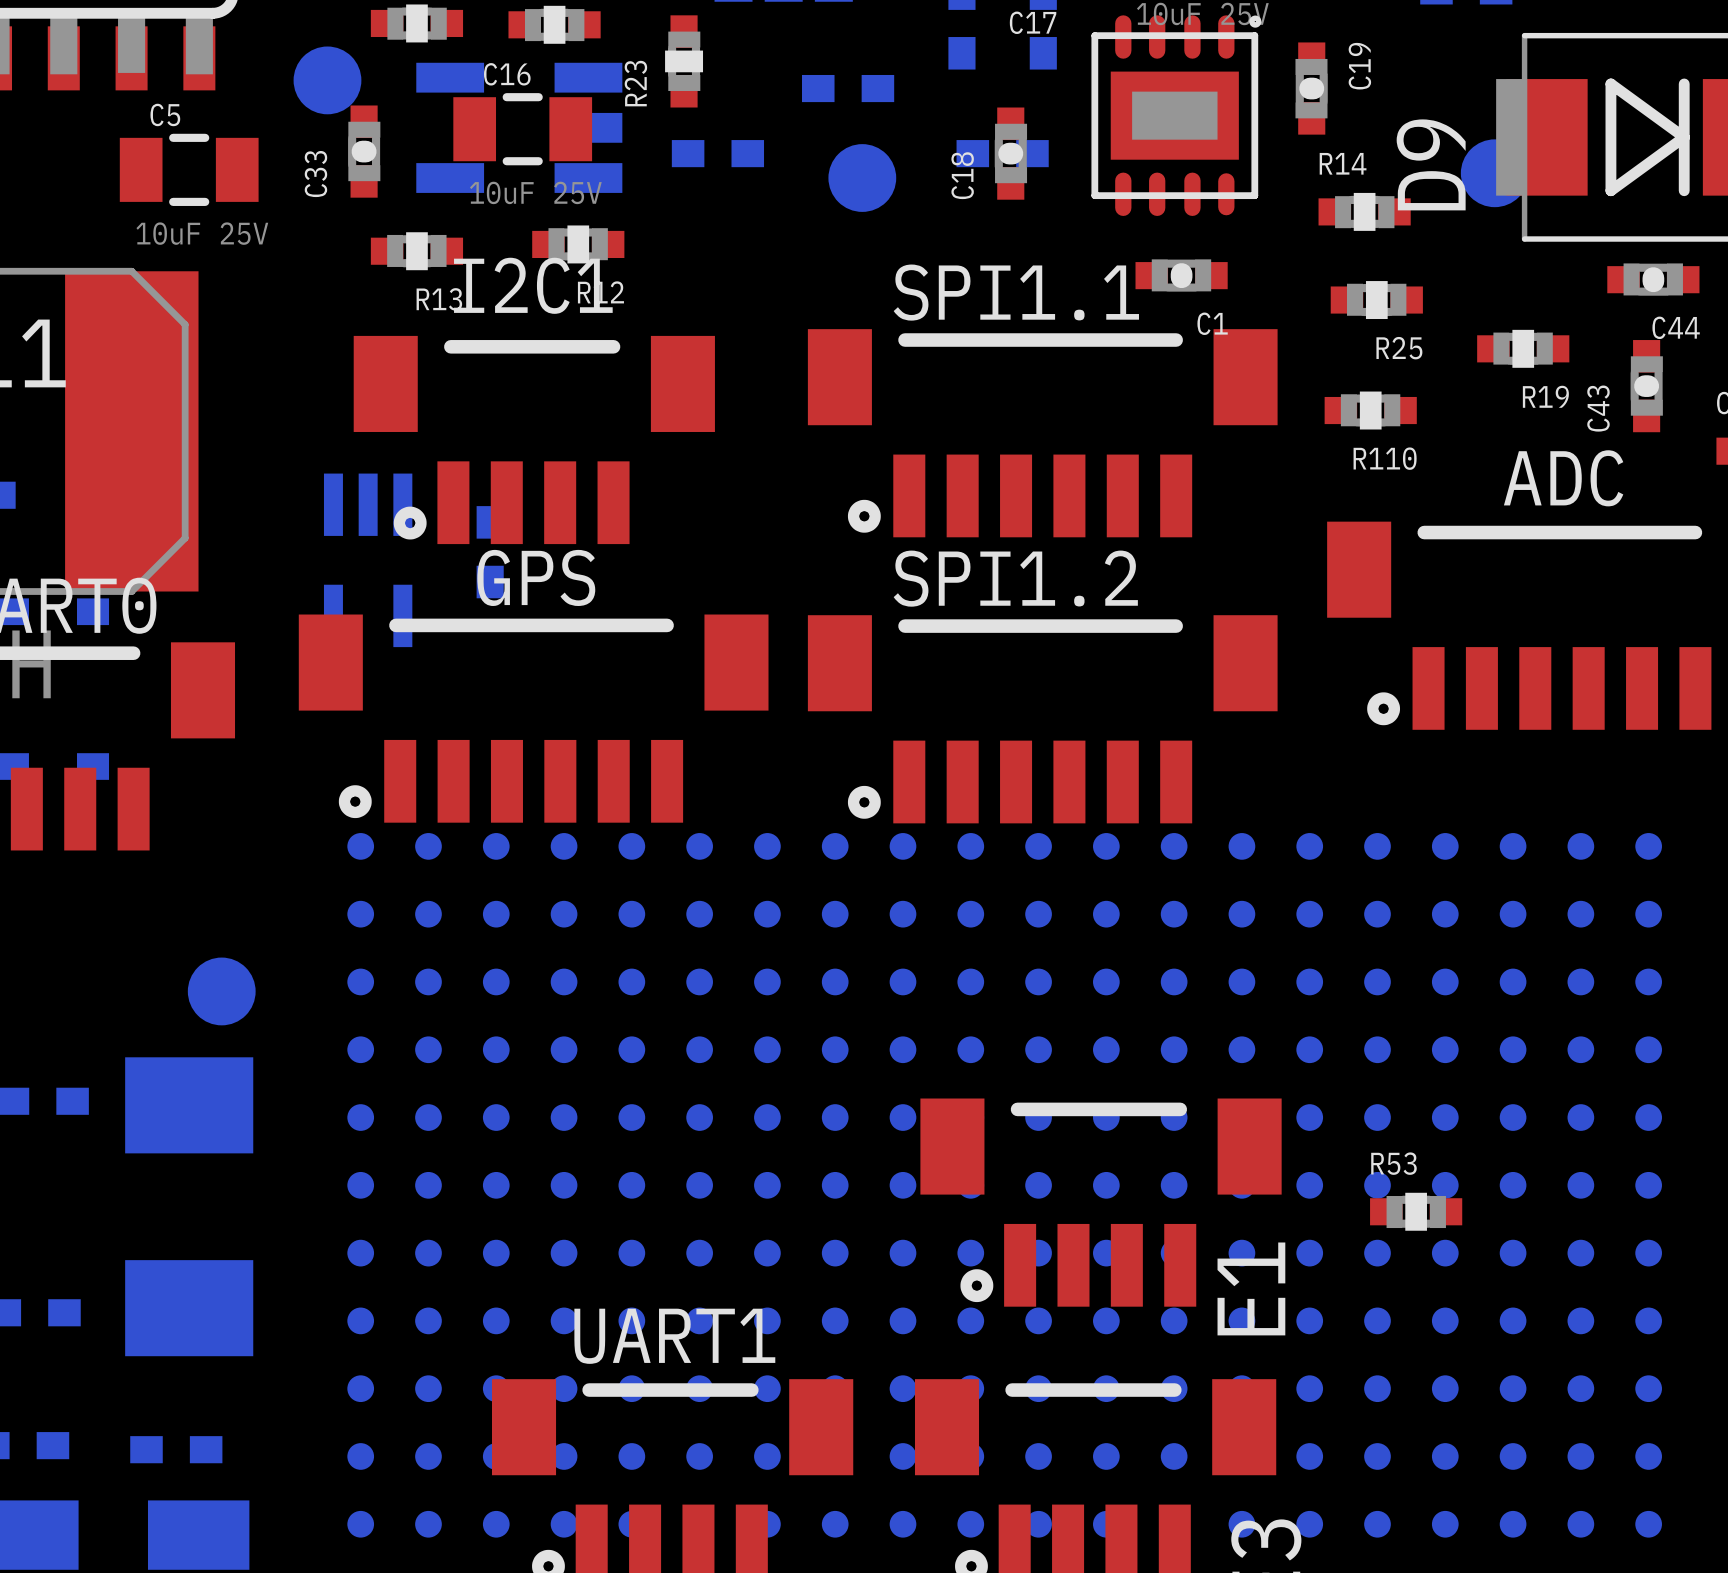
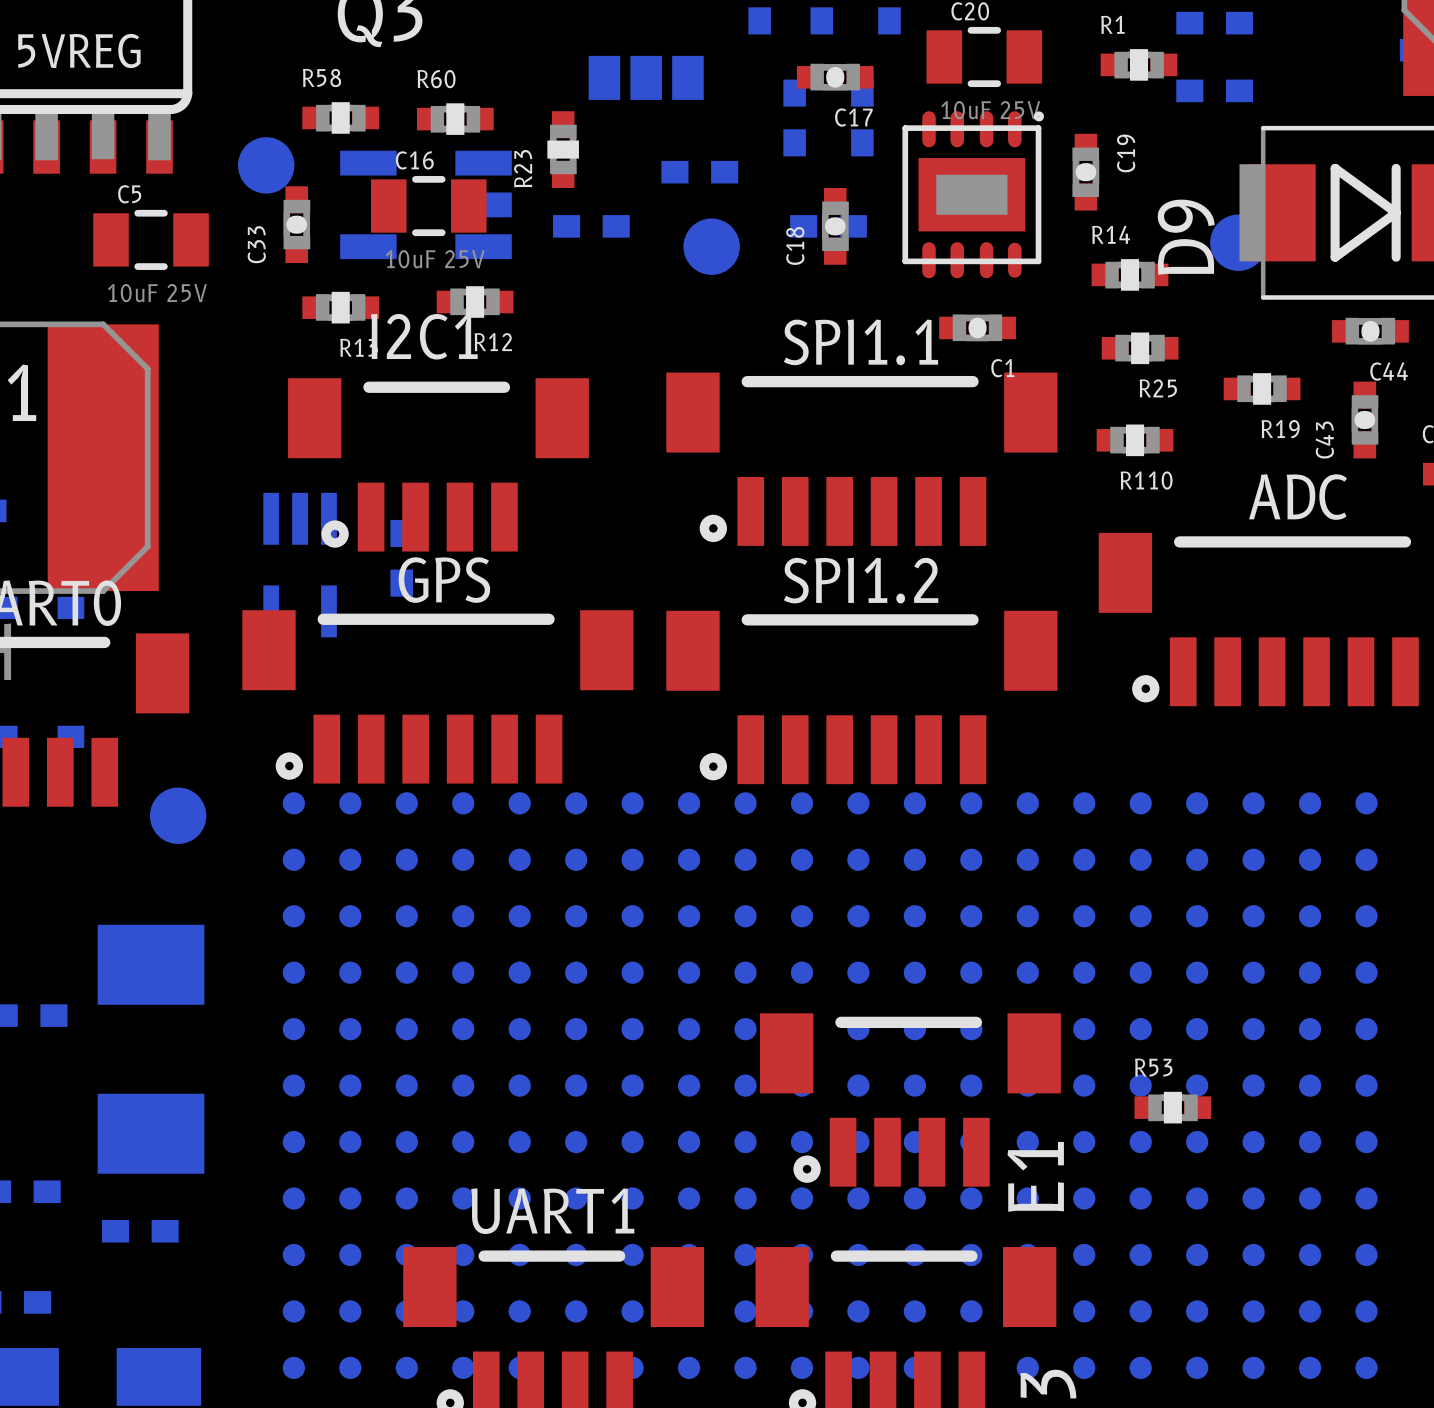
part position: (221, 991) -> (178, 815)
part position: (189, 1206) -> (151, 1049)
part position: (176, 1449) -> (140, 1231)

